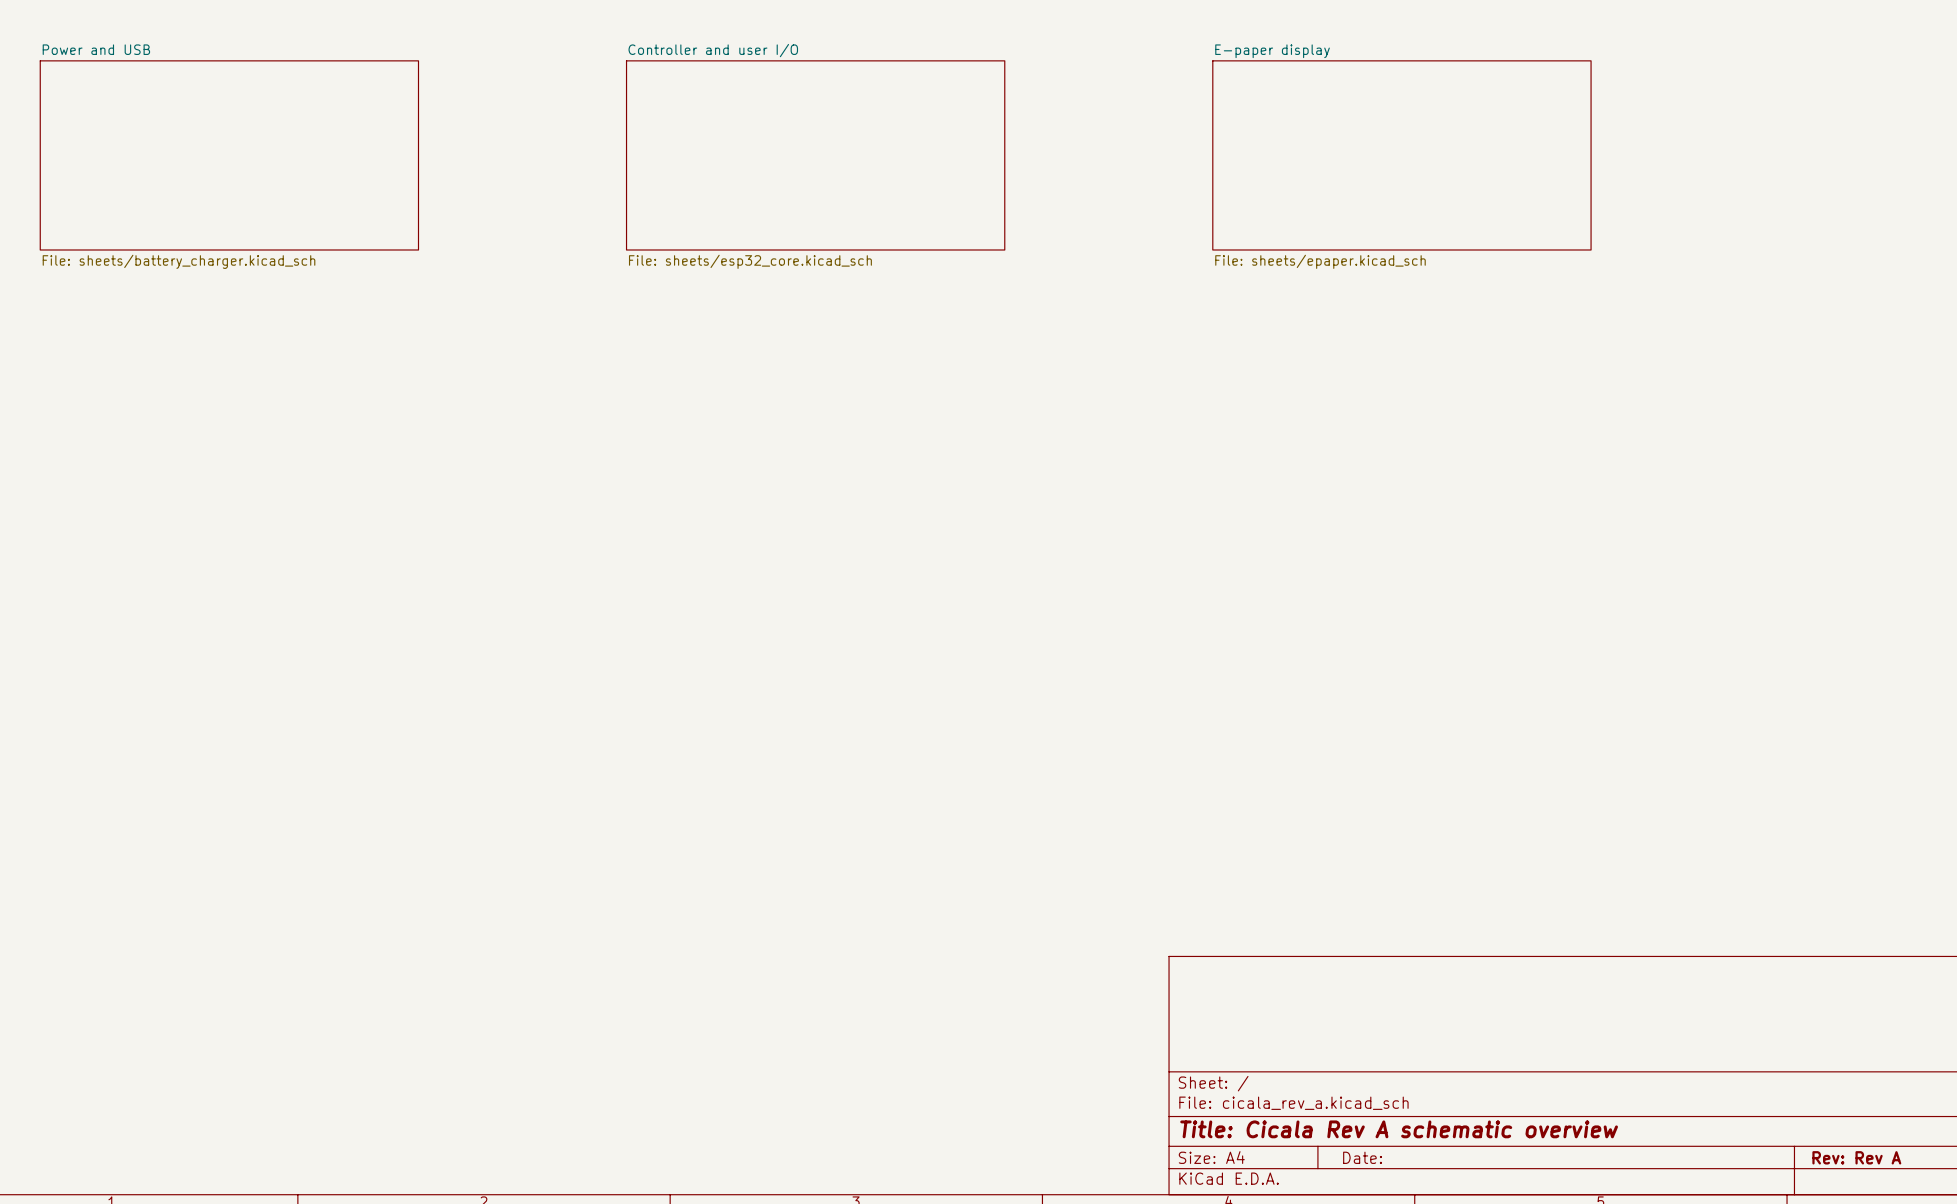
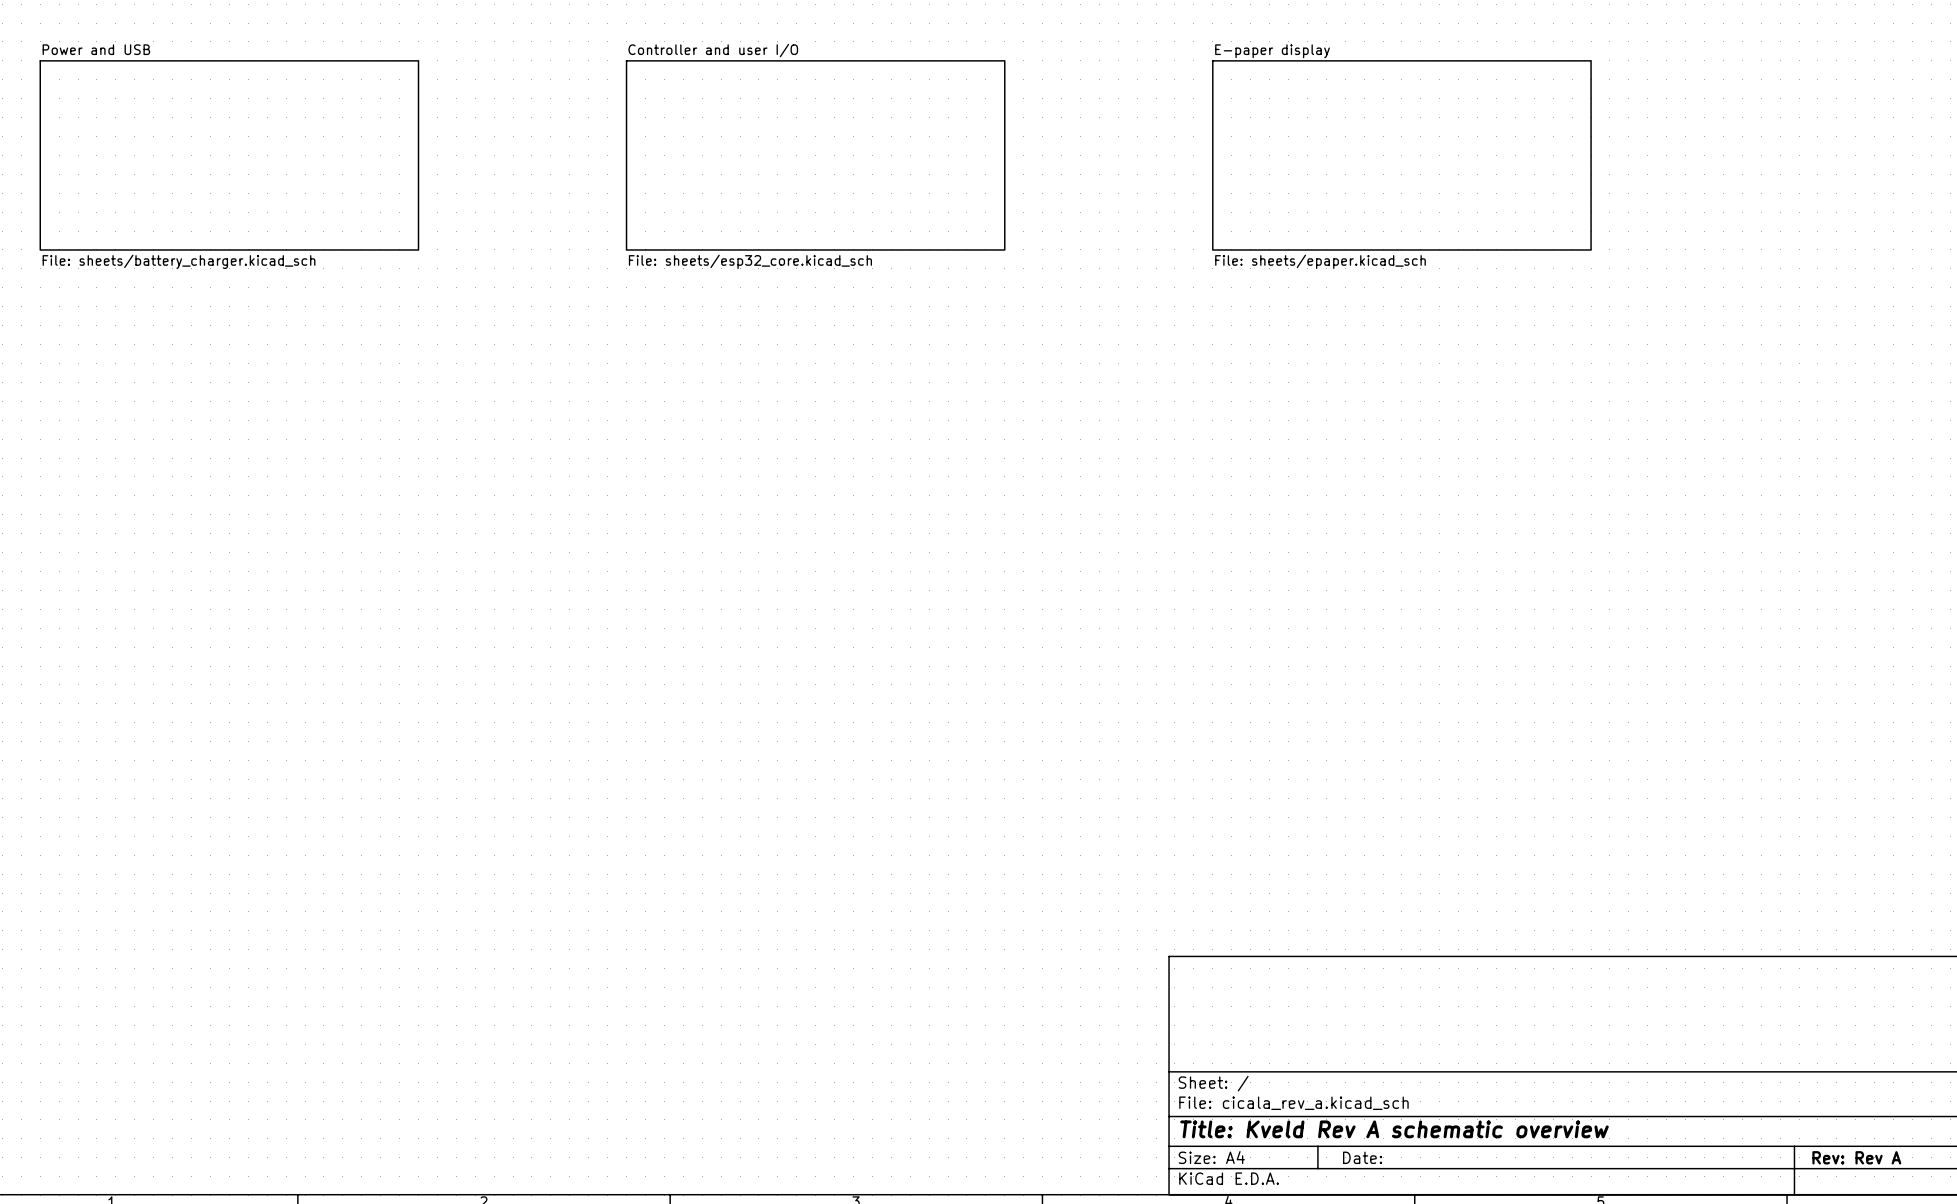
title block: Title: Cicala Rev A schematic overview (1399, 1129) -> Title: Kveld Rev A schematic overview (1394, 1129)

